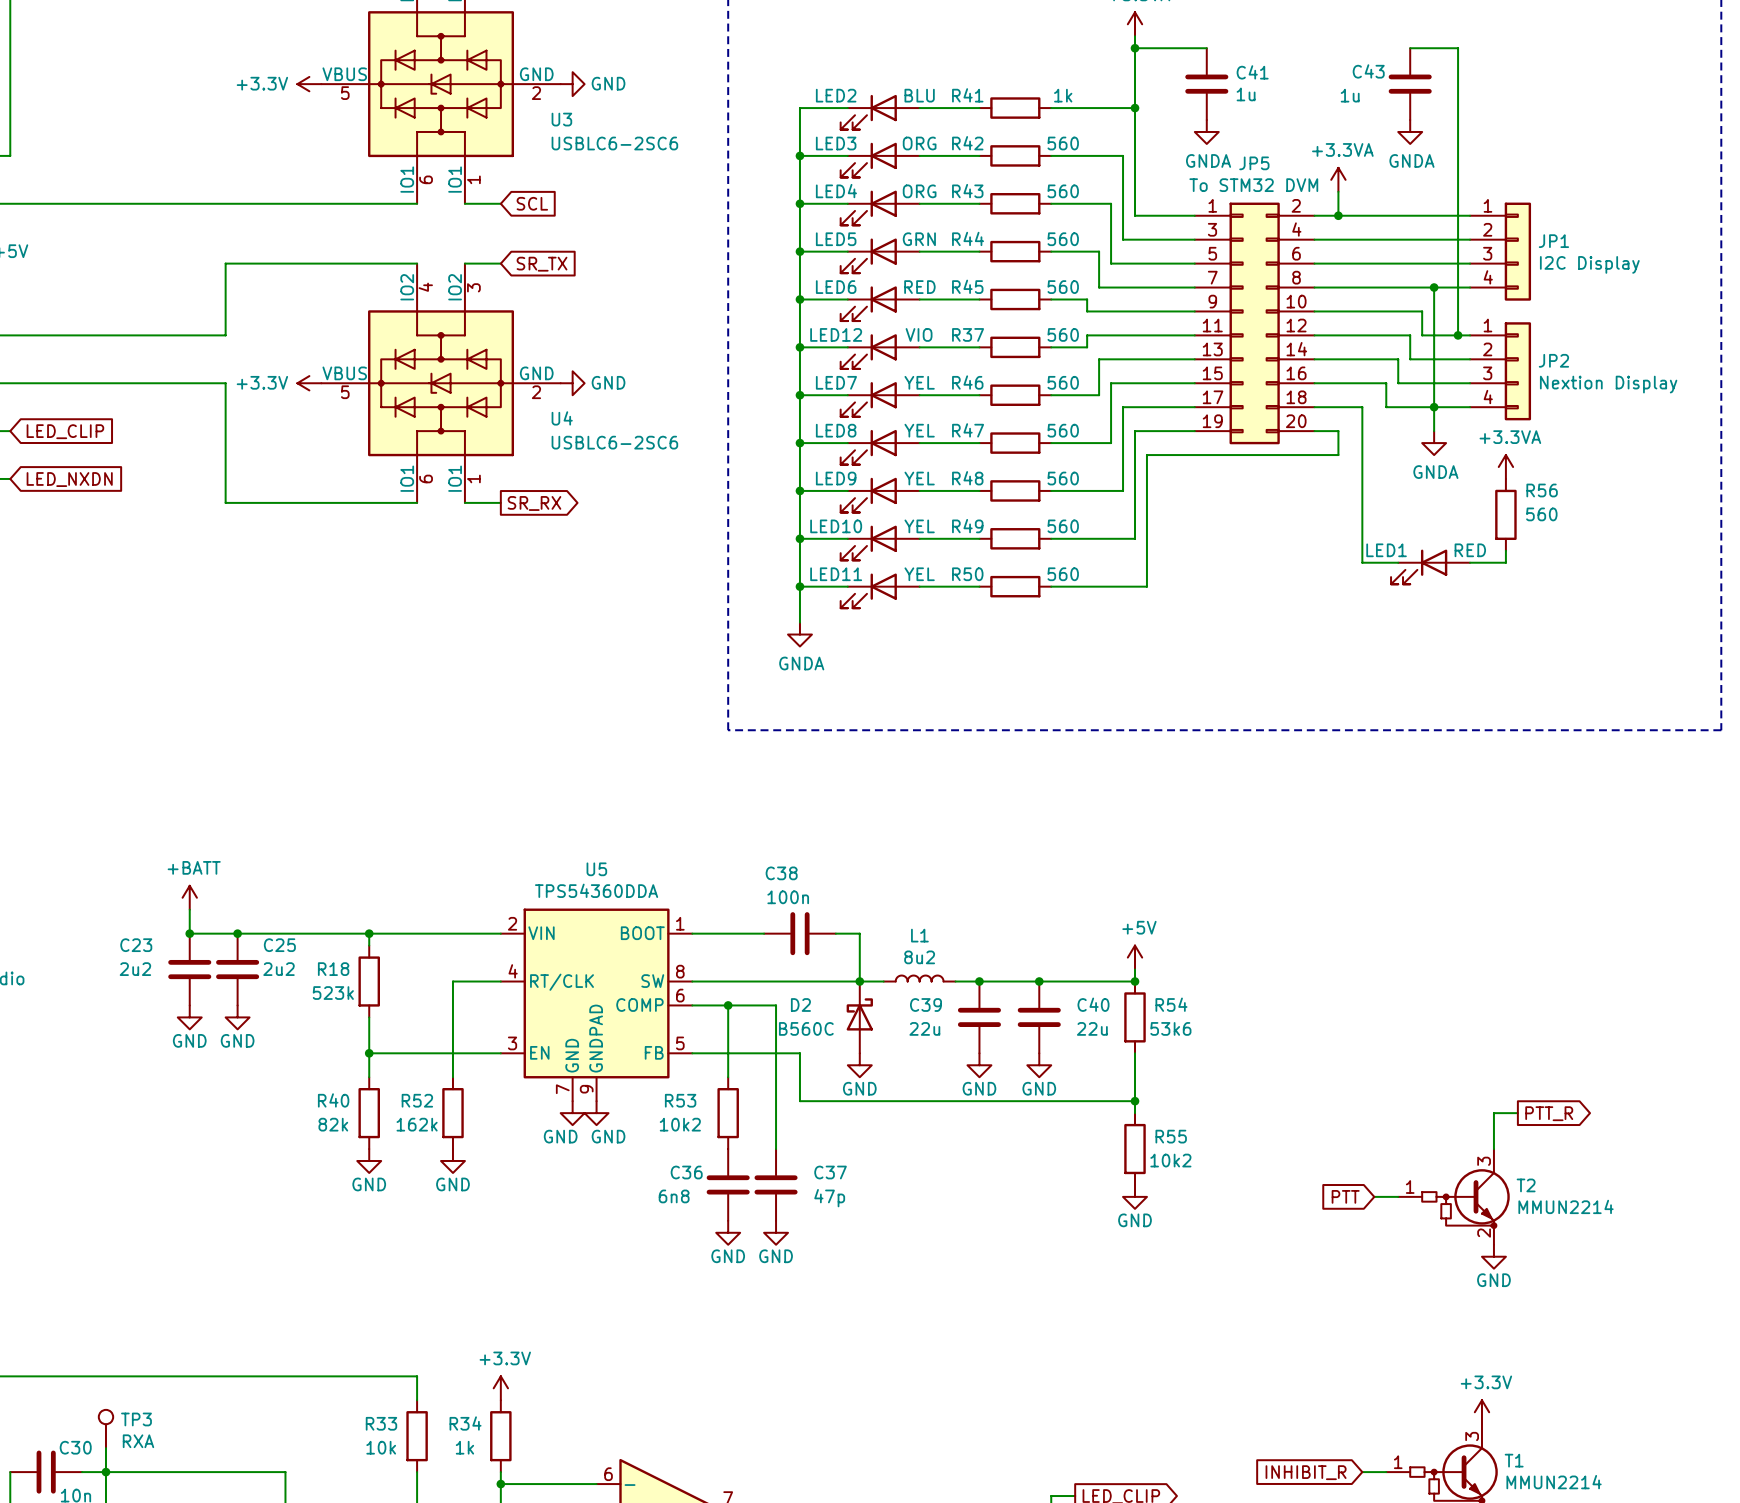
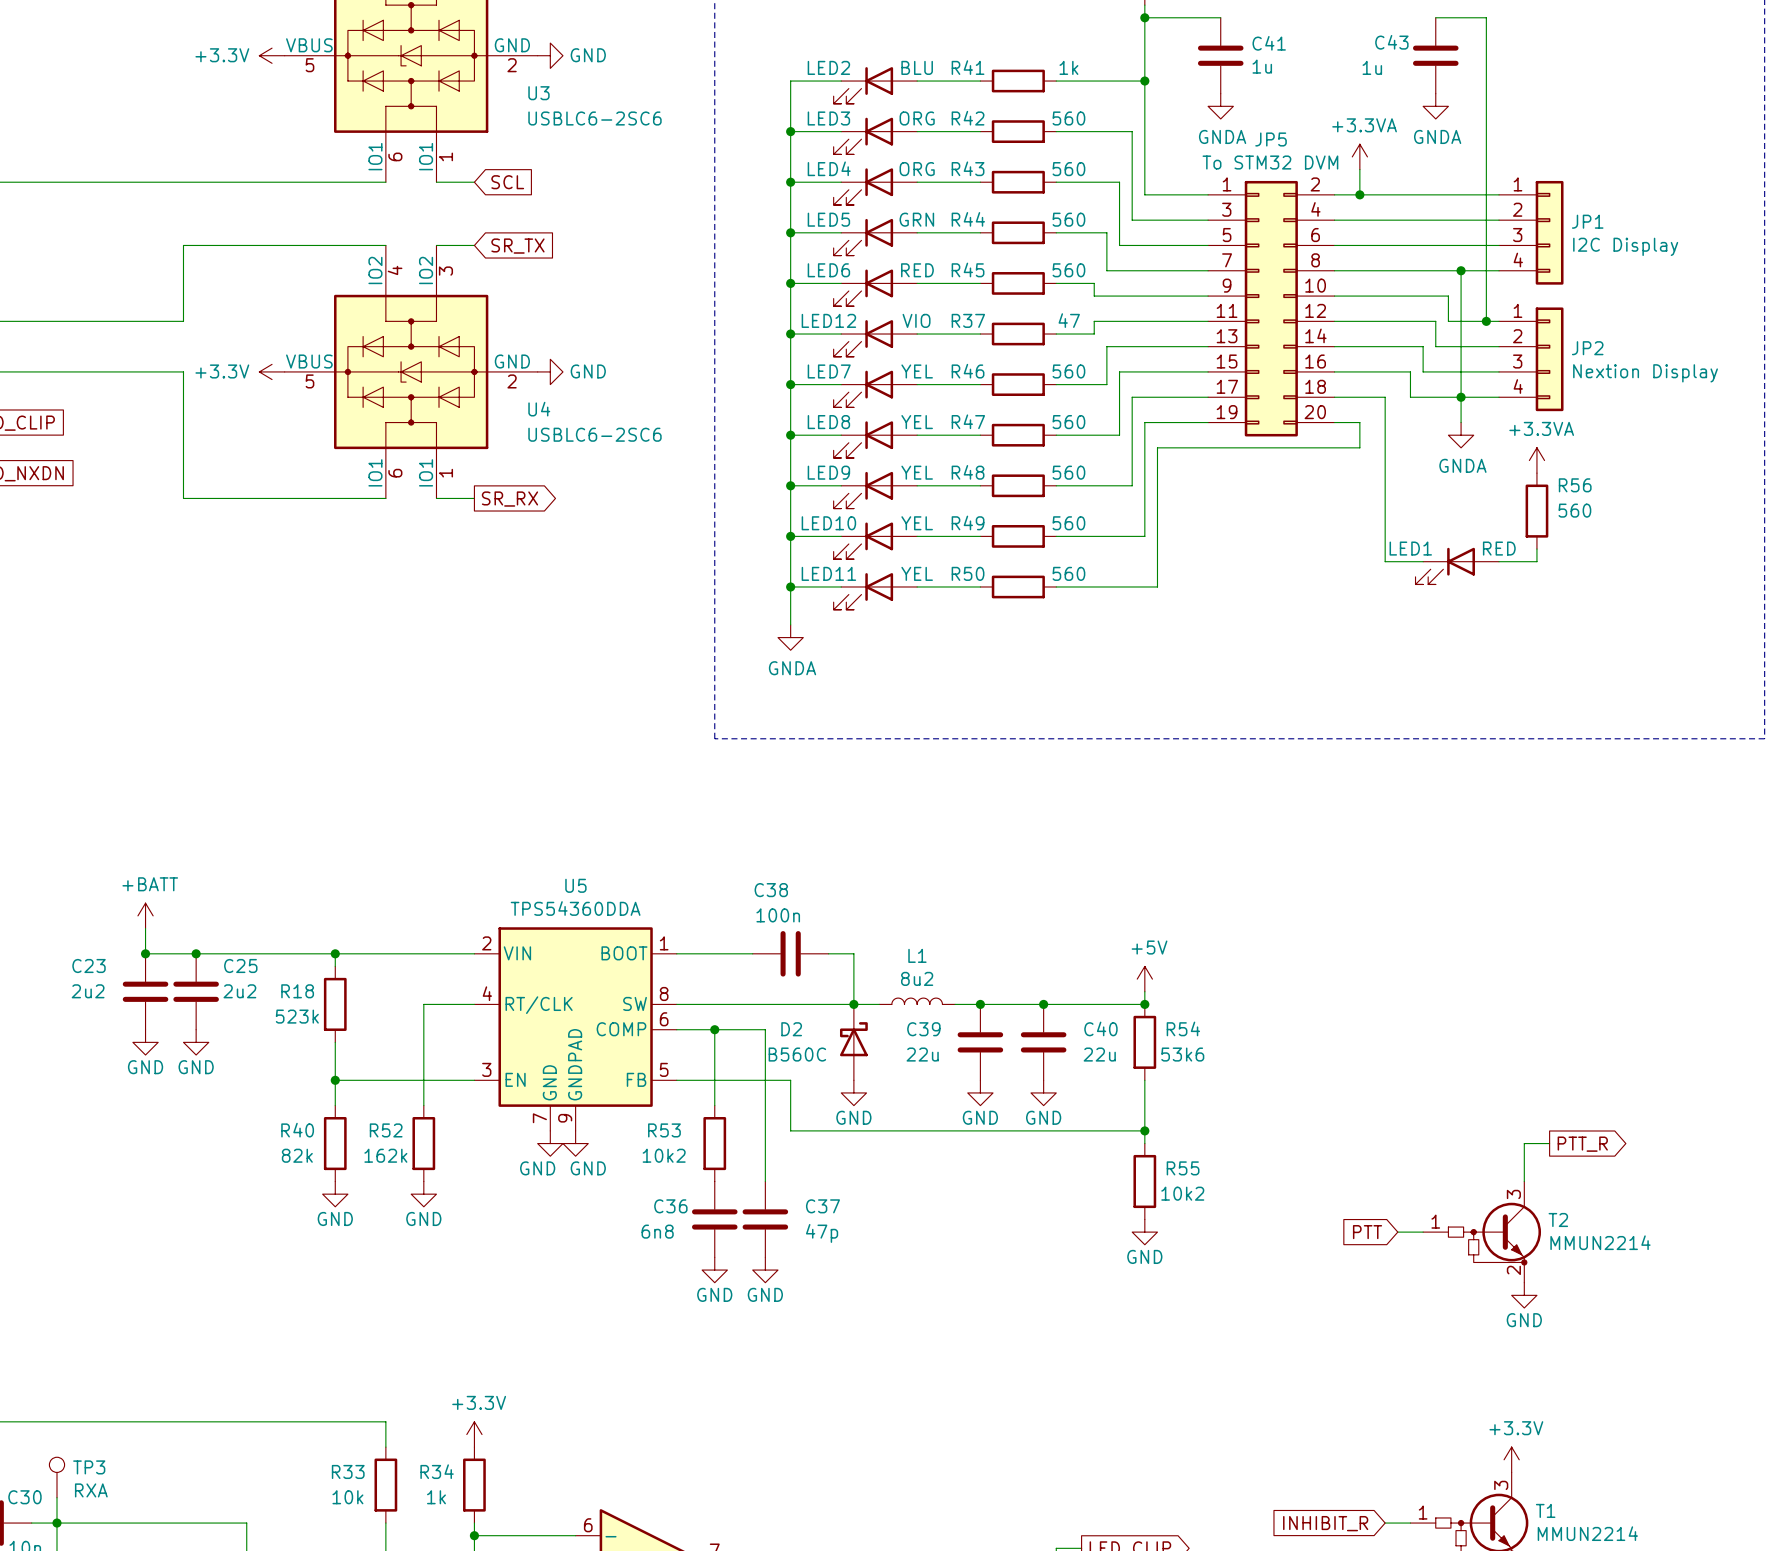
R37 value: 560 (1063, 334) -> 47 (1069, 320)

